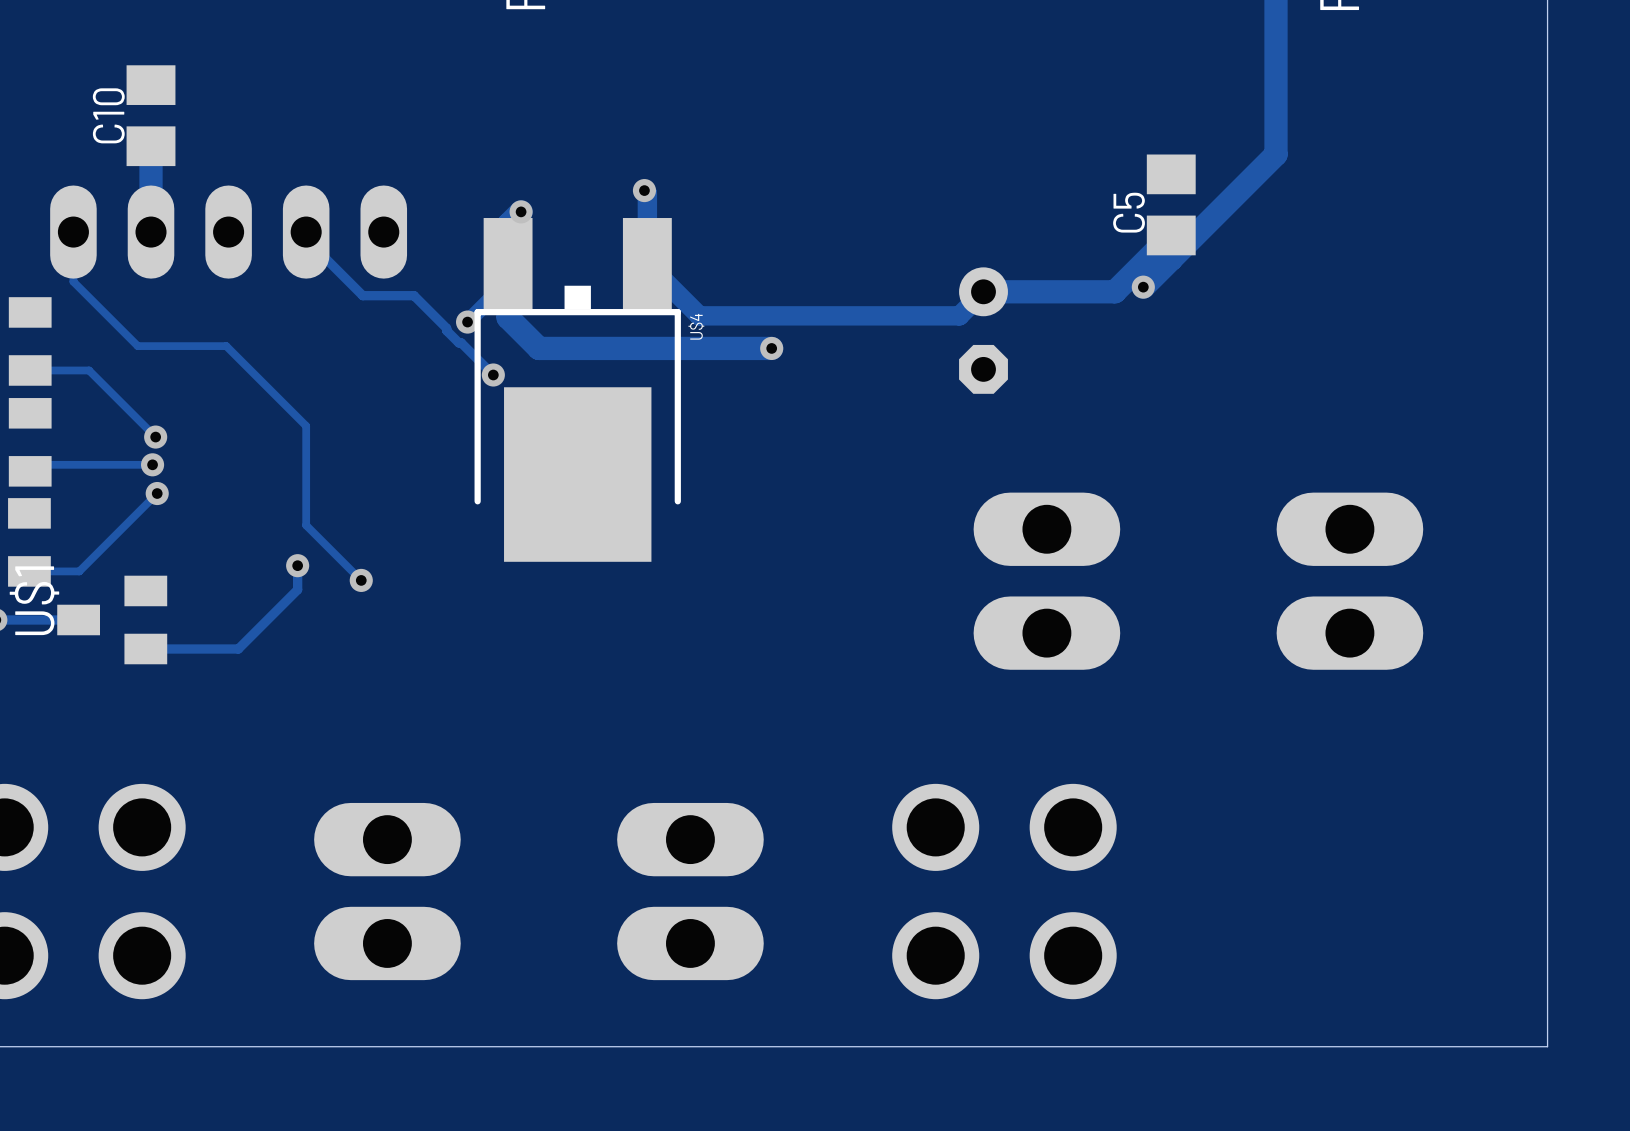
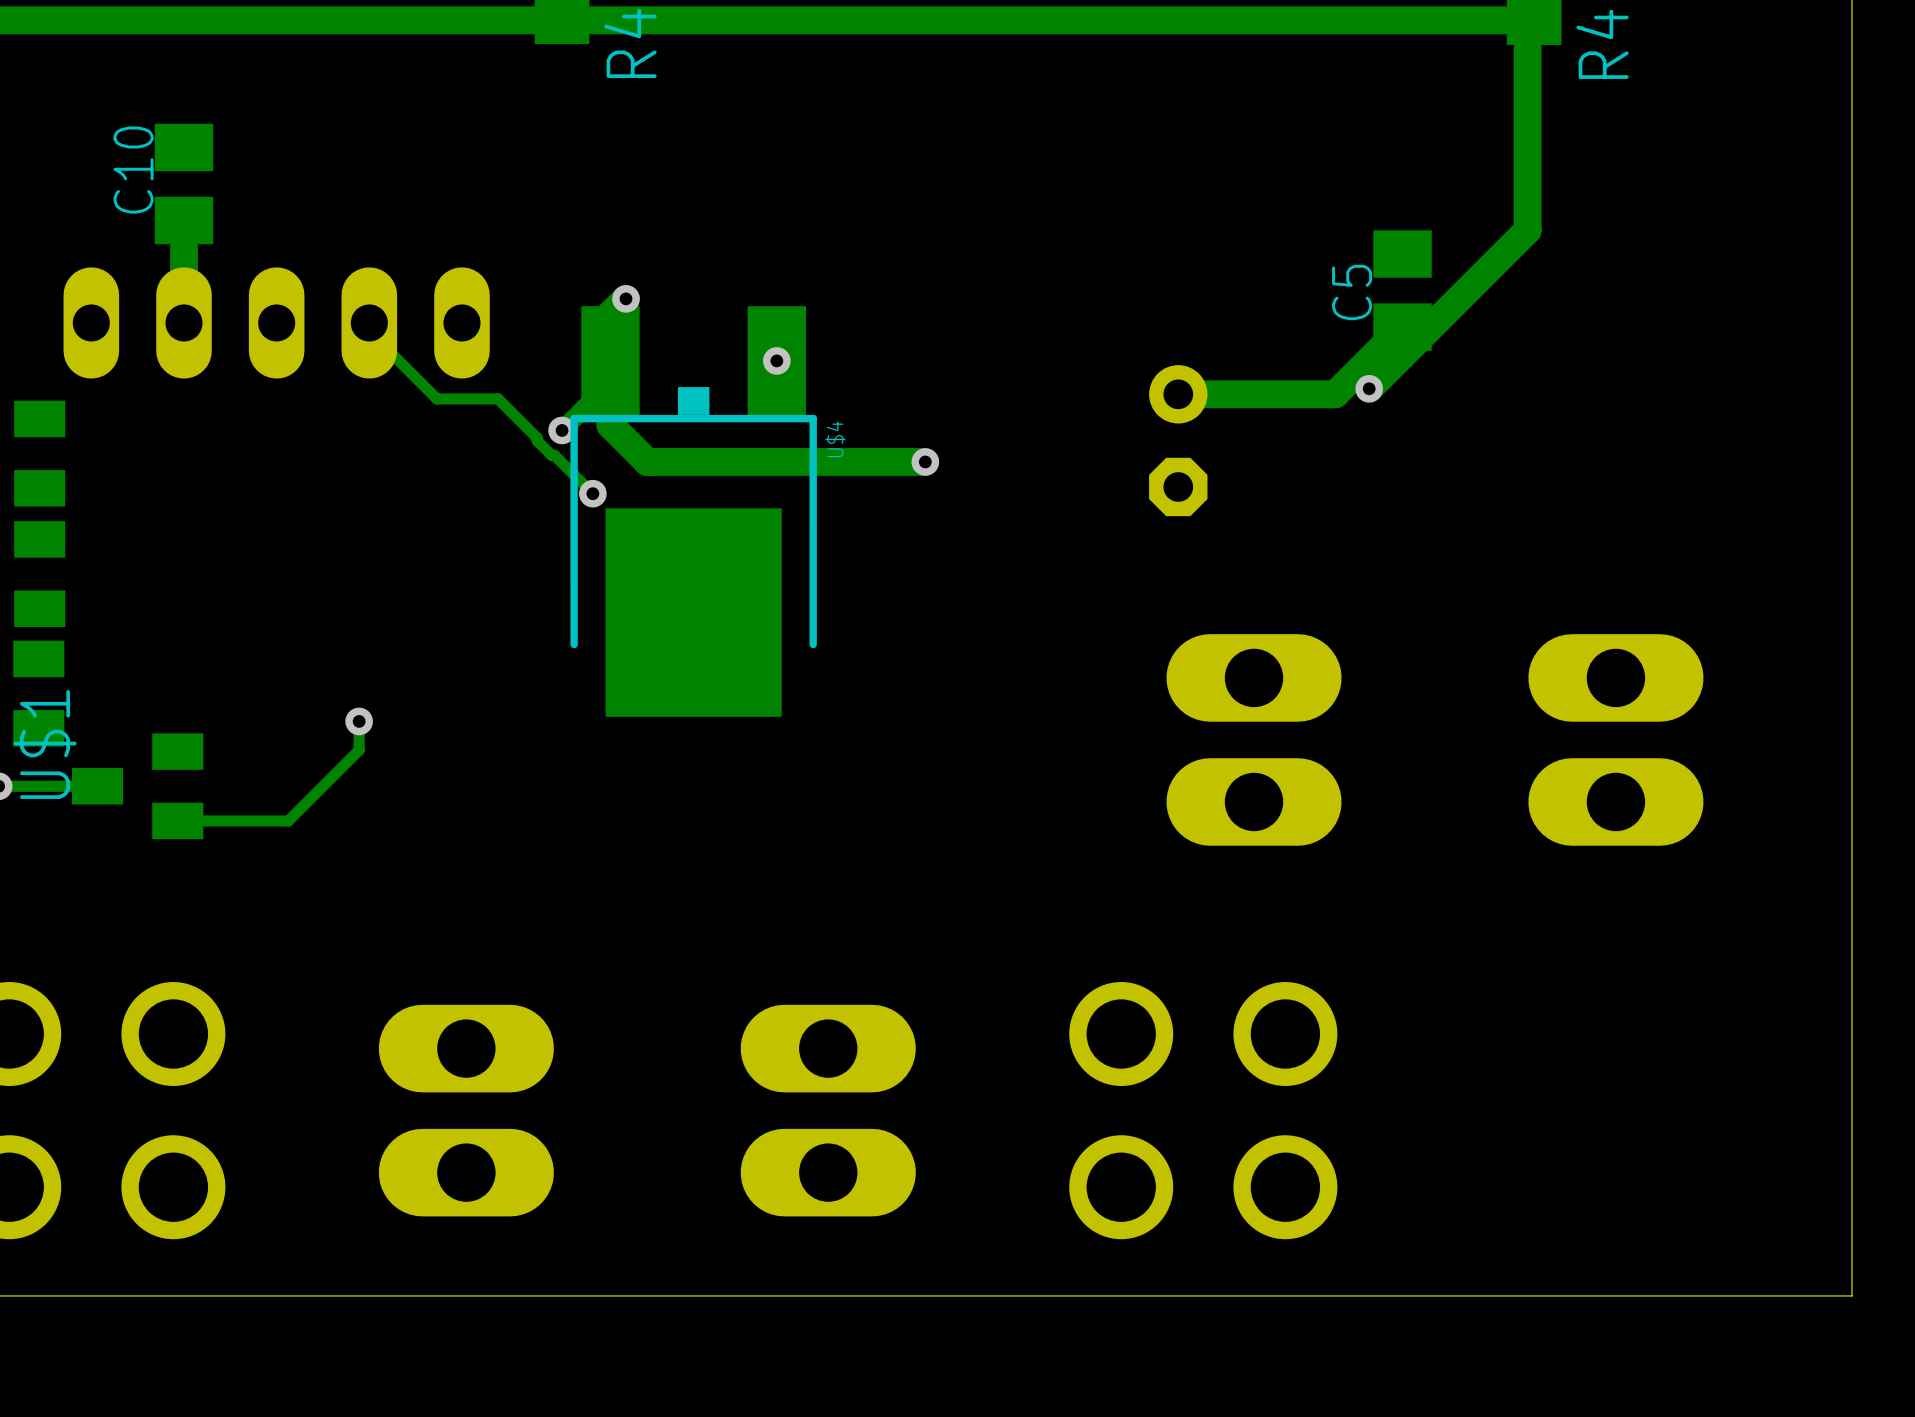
track: (644, 190) (647, 193) (647, 263) (699, 315) (959, 315) (983, 291) -> none
via position: (644, 190) -> (776, 360)
track: (73, 232) (73, 281) (137, 346) (226, 346) (306, 426) (306, 525) (361, 580) -> none
track: (30, 370) (89, 370) (155, 437) -> none
via: (155, 437) -> none
track: (152, 464) (36, 464) (30, 471) -> none
via: (152, 464) -> none
track: (157, 493) (79, 571) (29, 571) -> none
via: (157, 493) -> none
via: (361, 580) -> none

